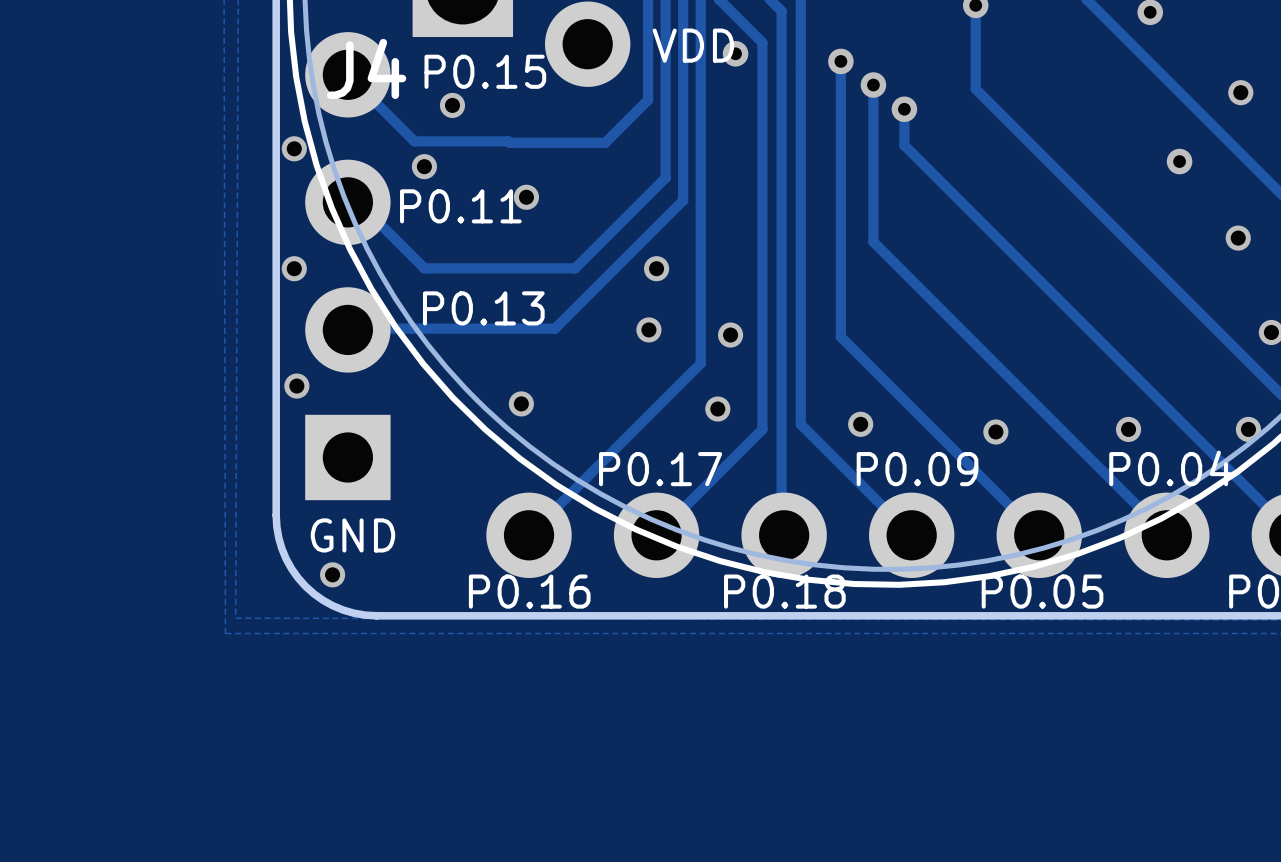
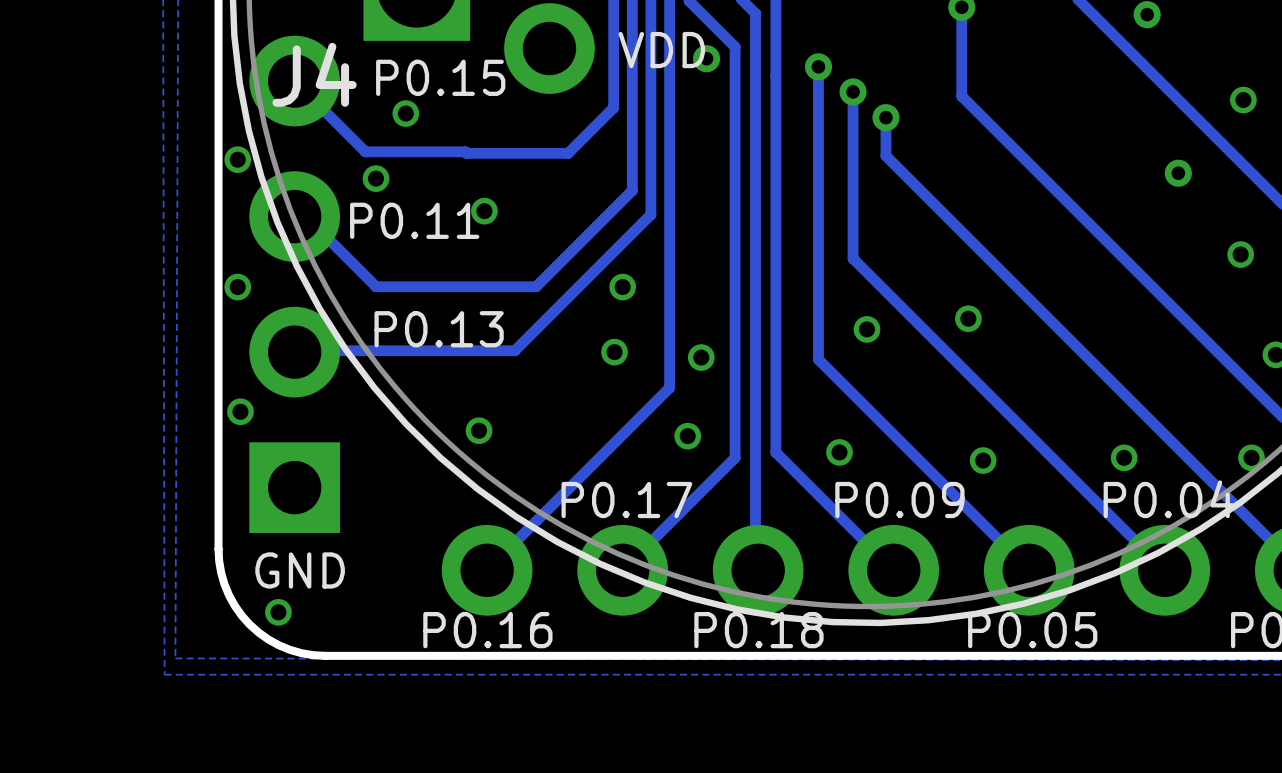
via: none -> (968, 318)
via: none -> (866, 329)

